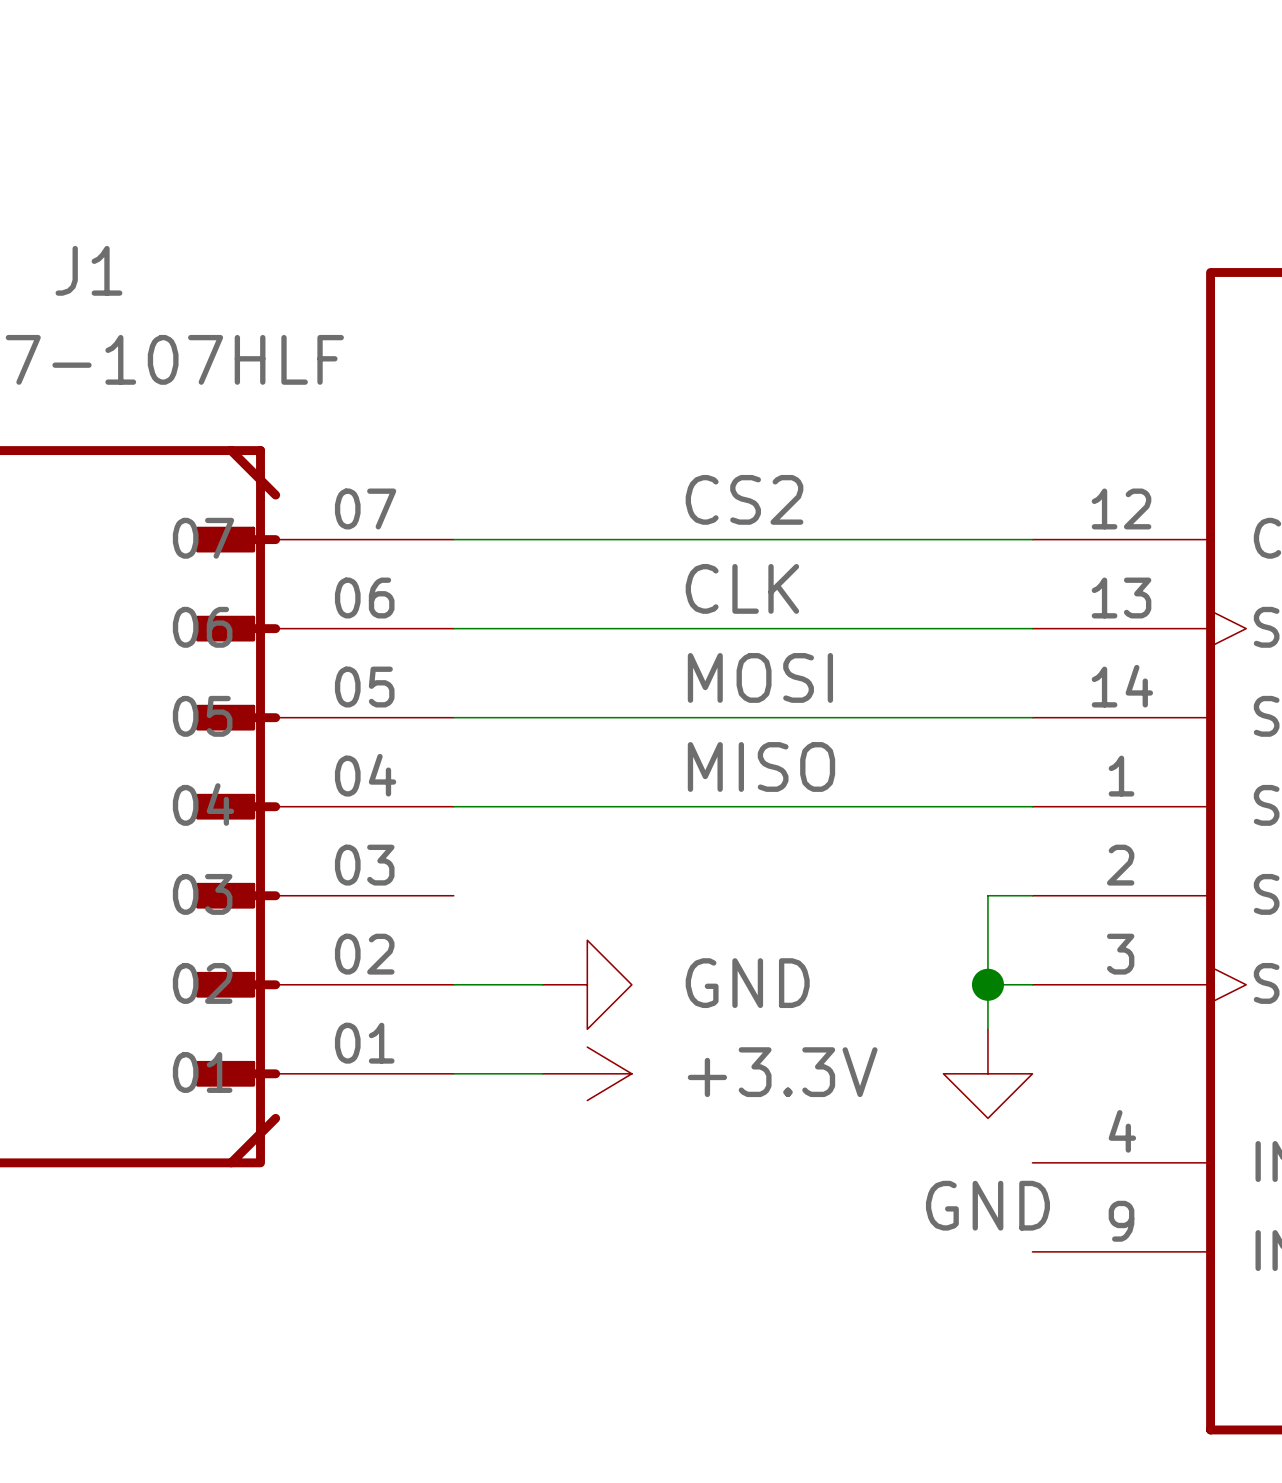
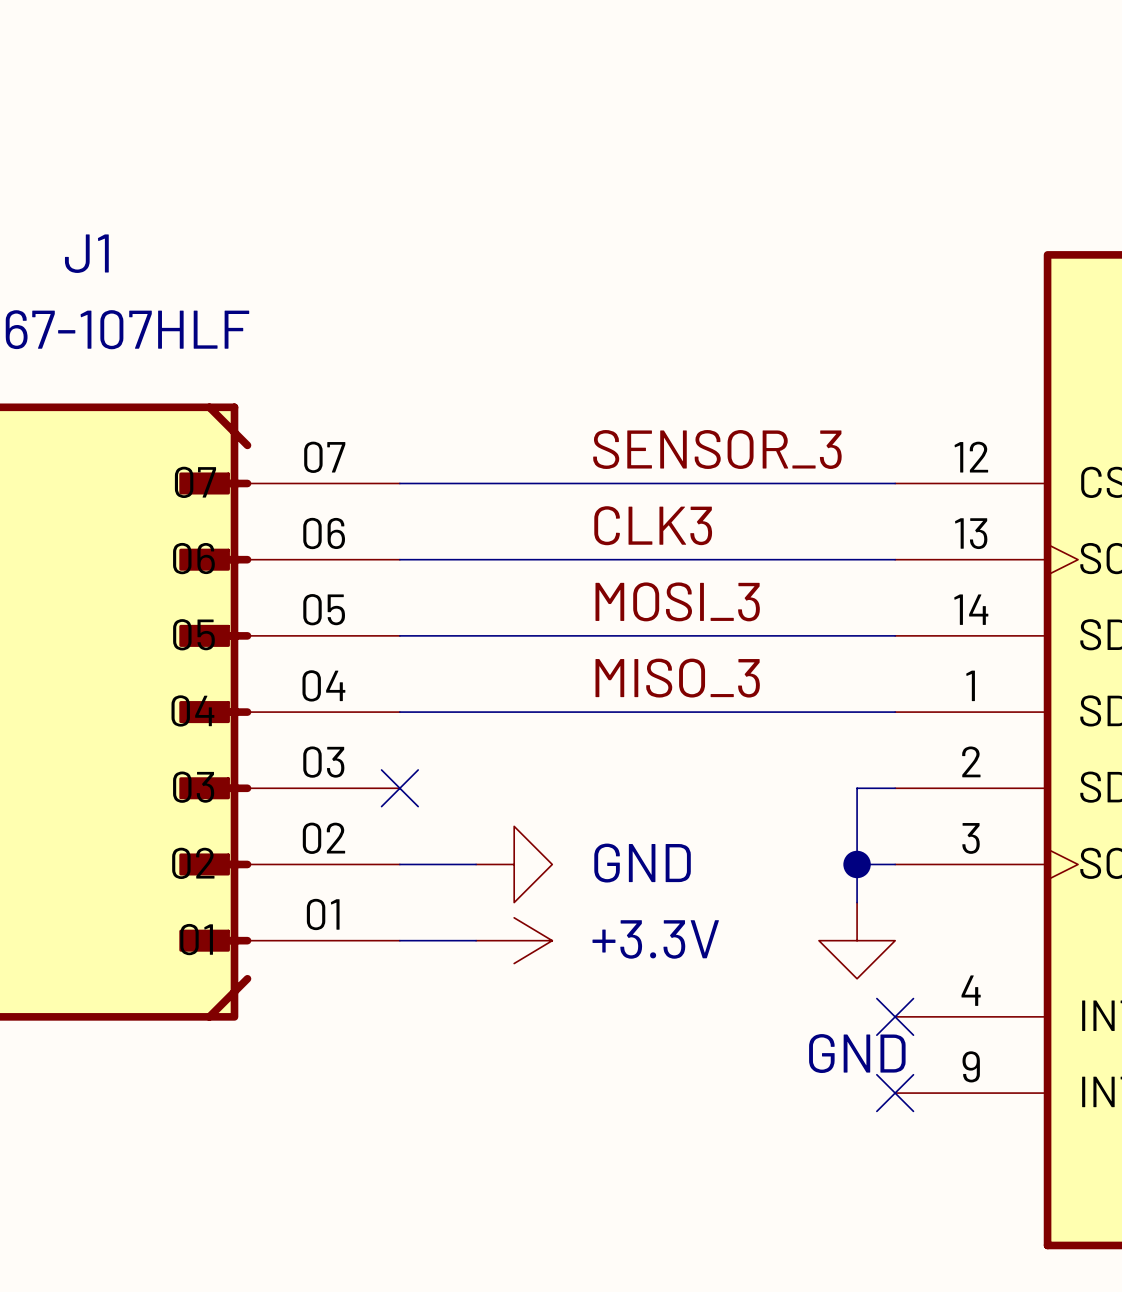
label: CS2 (744, 499) -> SENSOR_3 (717, 449)
label: CLK (742, 588) -> CLK3 (653, 525)
label: MOSI (760, 677) -> MOSI_3 (677, 601)
label: MISO (761, 766) -> MISO_3 (677, 678)
no-connect mark: none -> (399, 788)
no-connect mark: none -> (895, 1016)
no-connect mark: none -> (895, 1093)

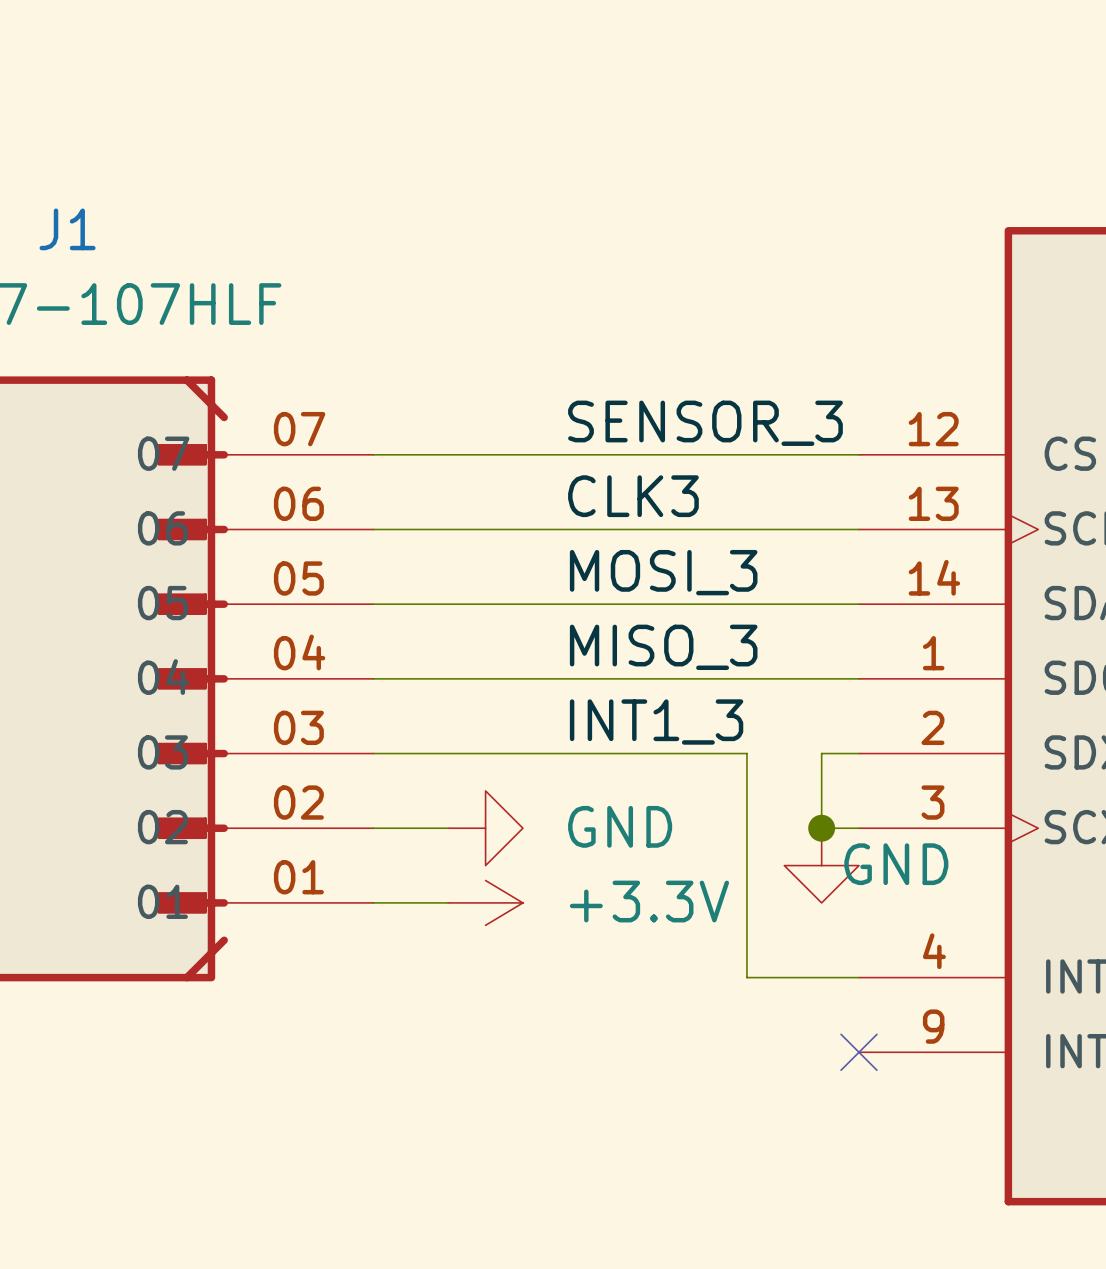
label: none -> INT1_3 (656, 722)
wire: none -> (373, 753) (746, 753) (746, 977) (859, 977)
no-connect mark: (399, 788) -> none
power symbol position: GND (857, 940) -> GND (821, 865)
no-connect mark: (895, 1016) -> none
power symbol text position: GND (857, 1053) -> GND (896, 864)

